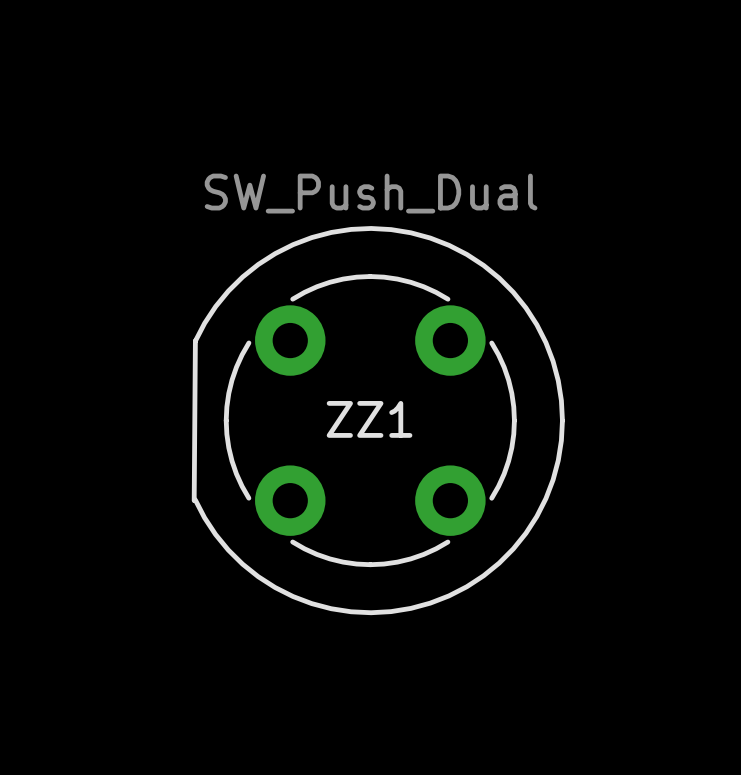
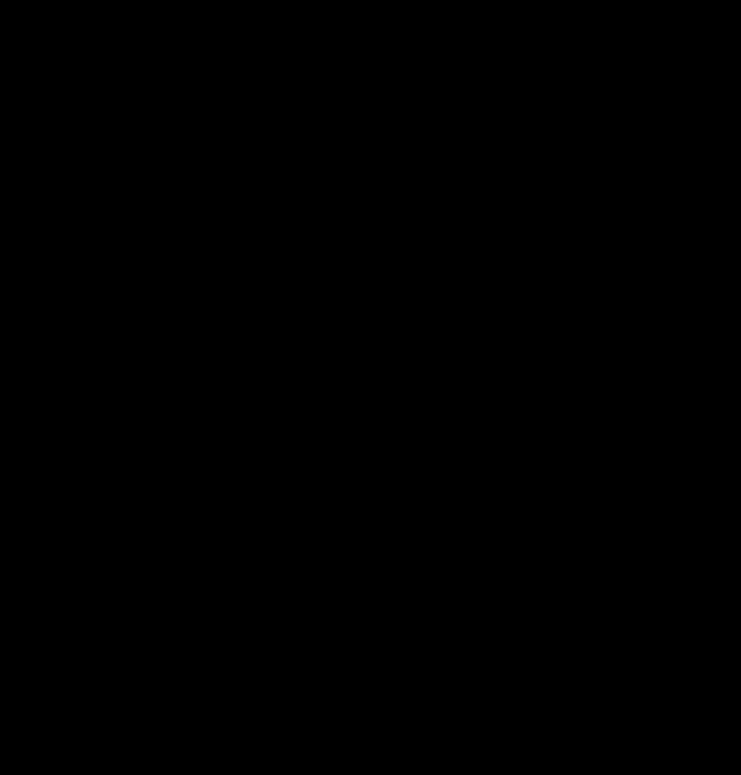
ZZ1: SW_Push_Dual (378, 420) -> none

